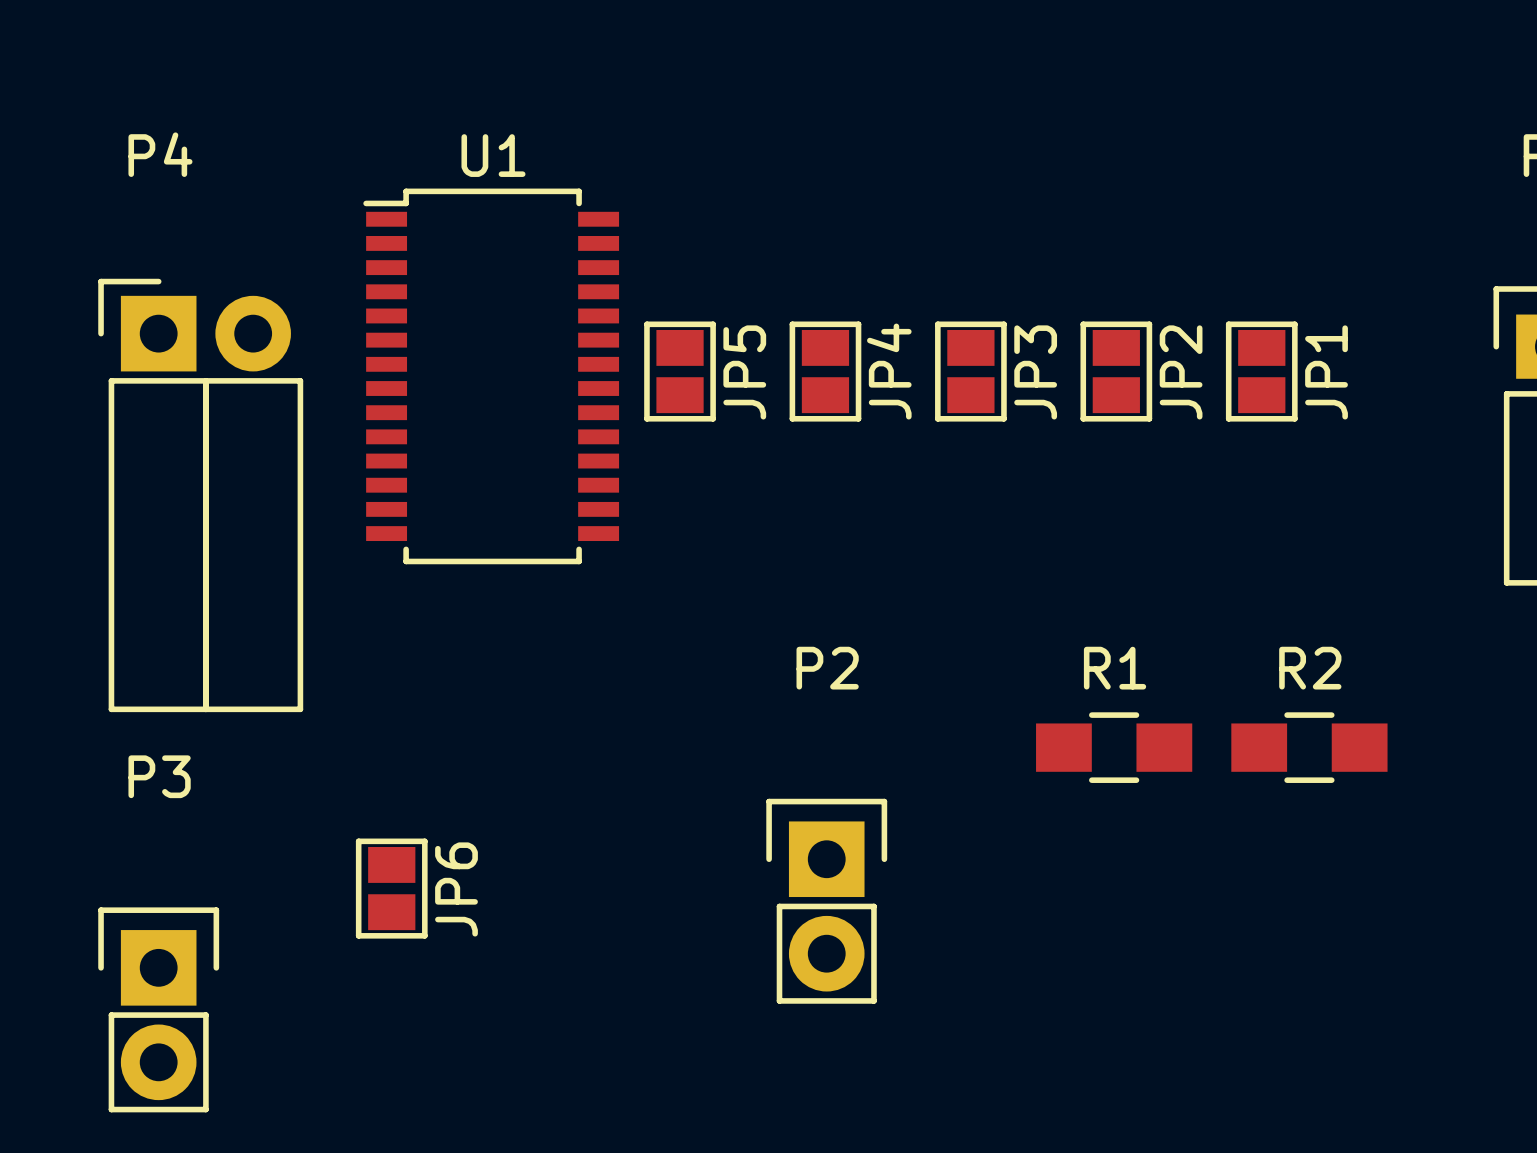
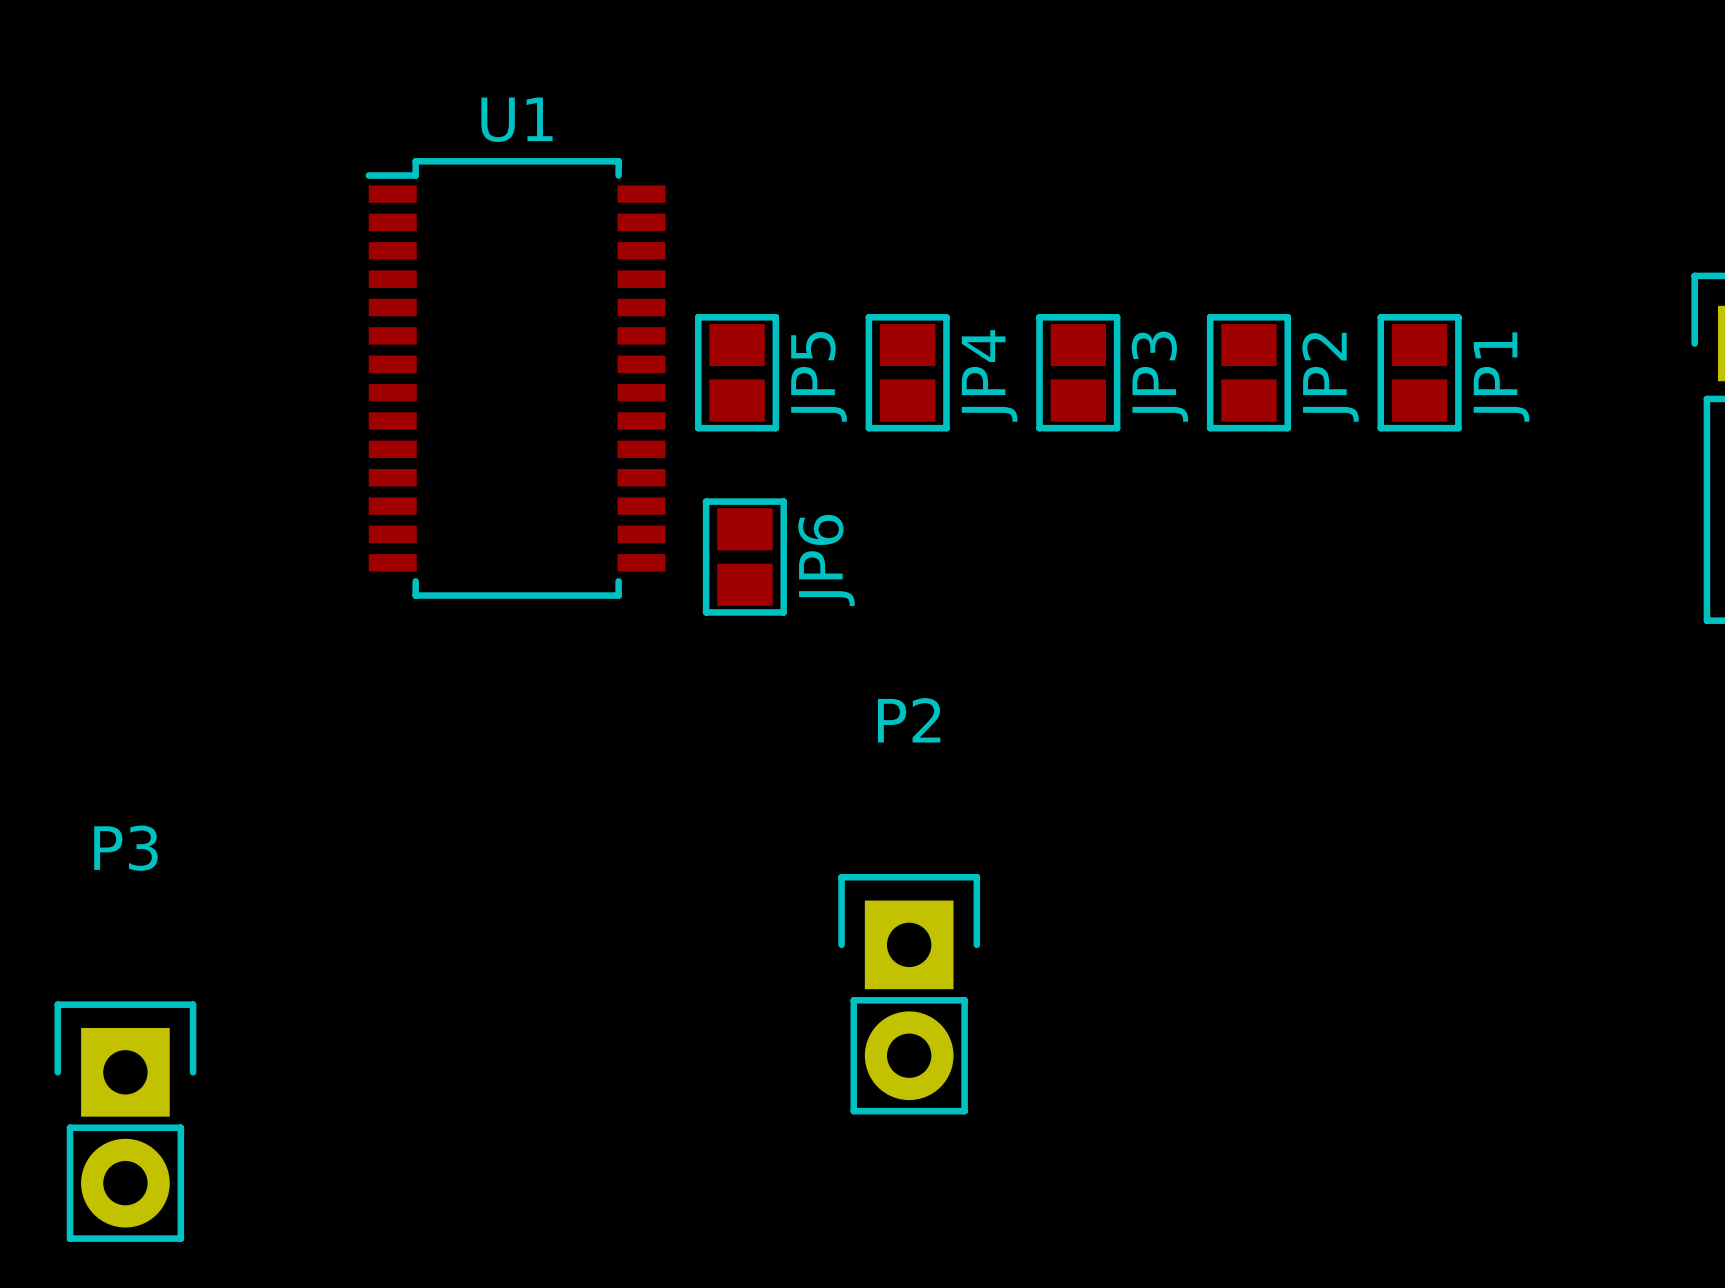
P4: (200, 495) -> none
R1: (1114, 747) -> none
R2: (1309, 747) -> none
JP6 position: (391, 888) -> (744, 557)

